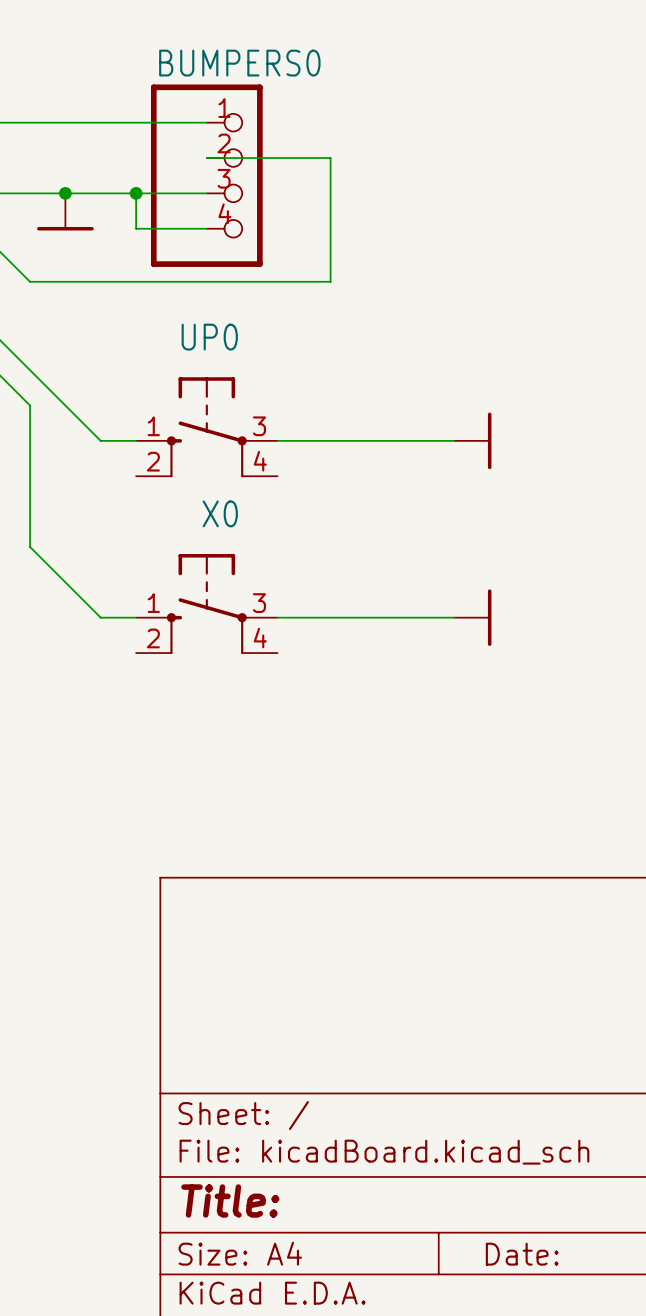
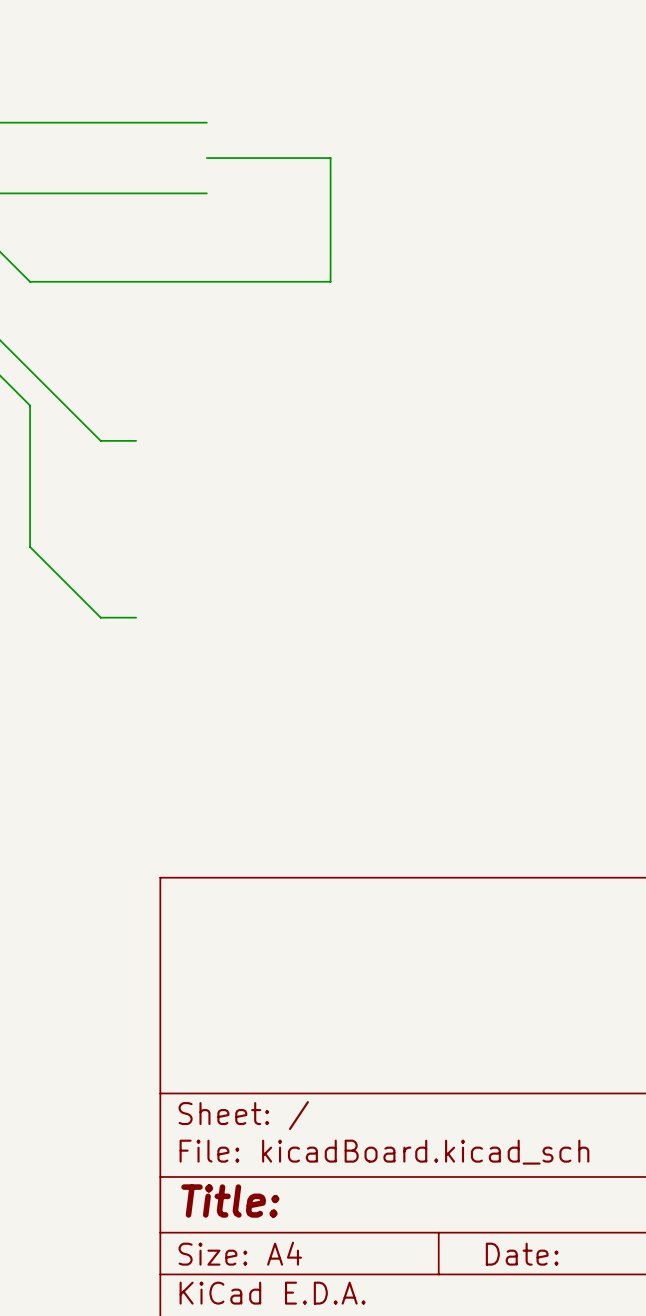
BUMPERS0: (206, 175) -> none
junction: (65, 193) -> none
wire: (136, 193) (136, 228) (206, 228) -> none
junction: (136, 193) -> none
power symbol: (65, 211) -> none
UP0: (206, 427) -> none
wire: (277, 440) (454, 440) -> none
power symbol: (472, 440) -> none
X0: (206, 604) -> none
wire: (277, 617) (454, 617) -> none
power symbol: (472, 617) -> none

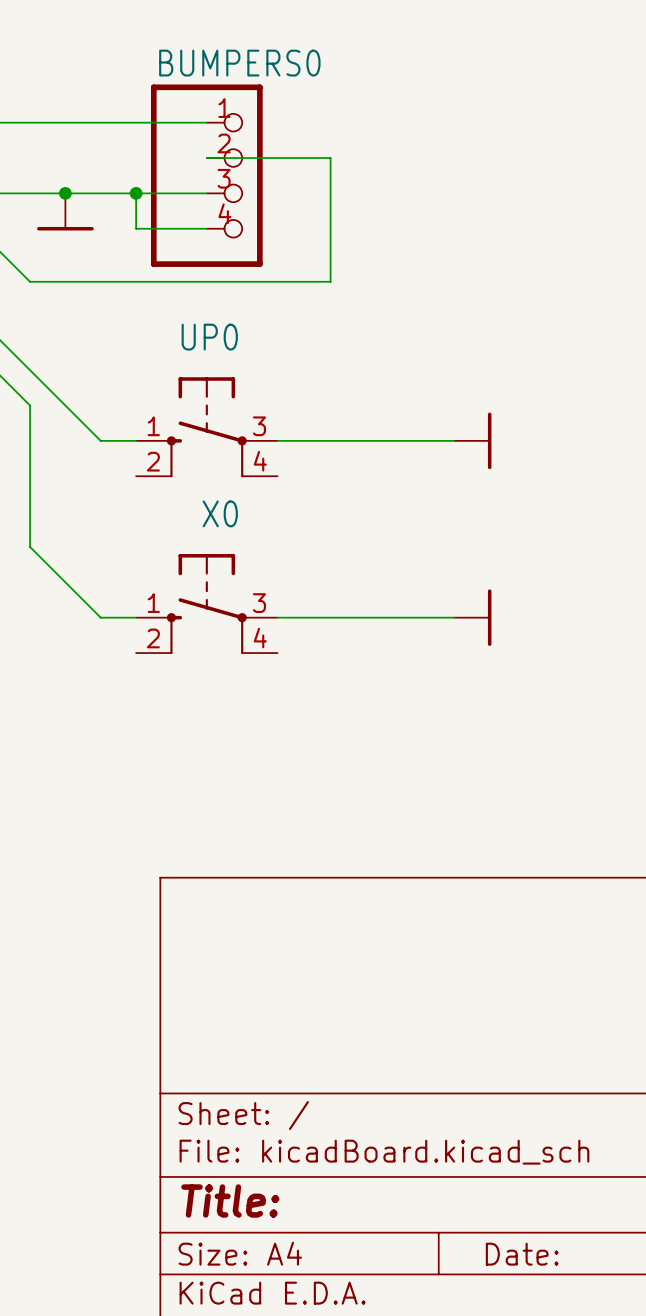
BUMPERS0: none -> (206, 175)
junction: none -> (65, 193)
wire: none -> (136, 193) (136, 228) (206, 228)
junction: none -> (136, 193)
power symbol: none -> (65, 211)
UP0: none -> (206, 427)
wire: none -> (277, 440) (454, 440)
power symbol: none -> (472, 440)
X0: none -> (206, 604)
wire: none -> (277, 617) (454, 617)
power symbol: none -> (472, 617)

